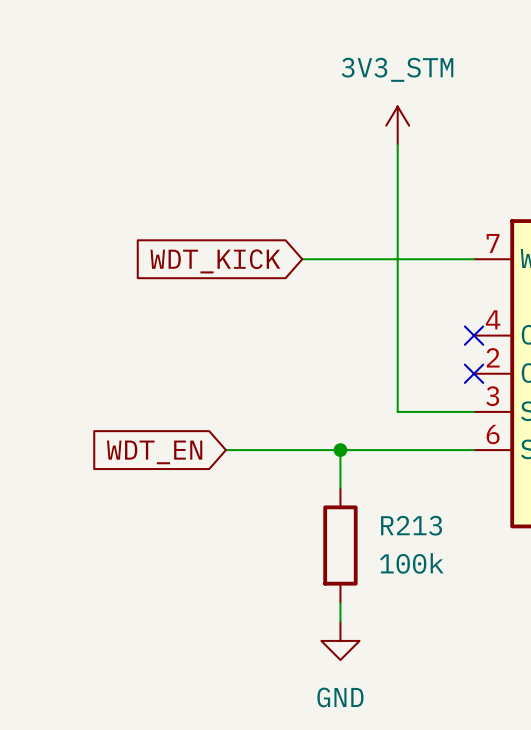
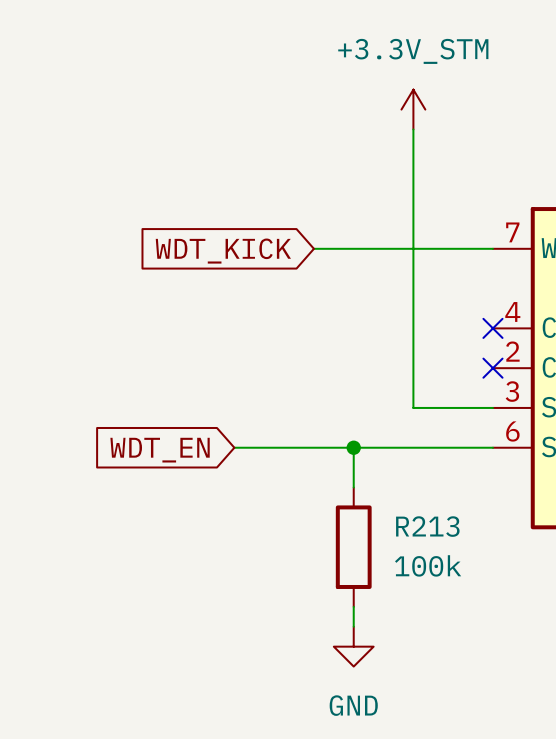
power symbol: 3V3_STM (397, 125) -> +3.3V_STM (413, 109)

